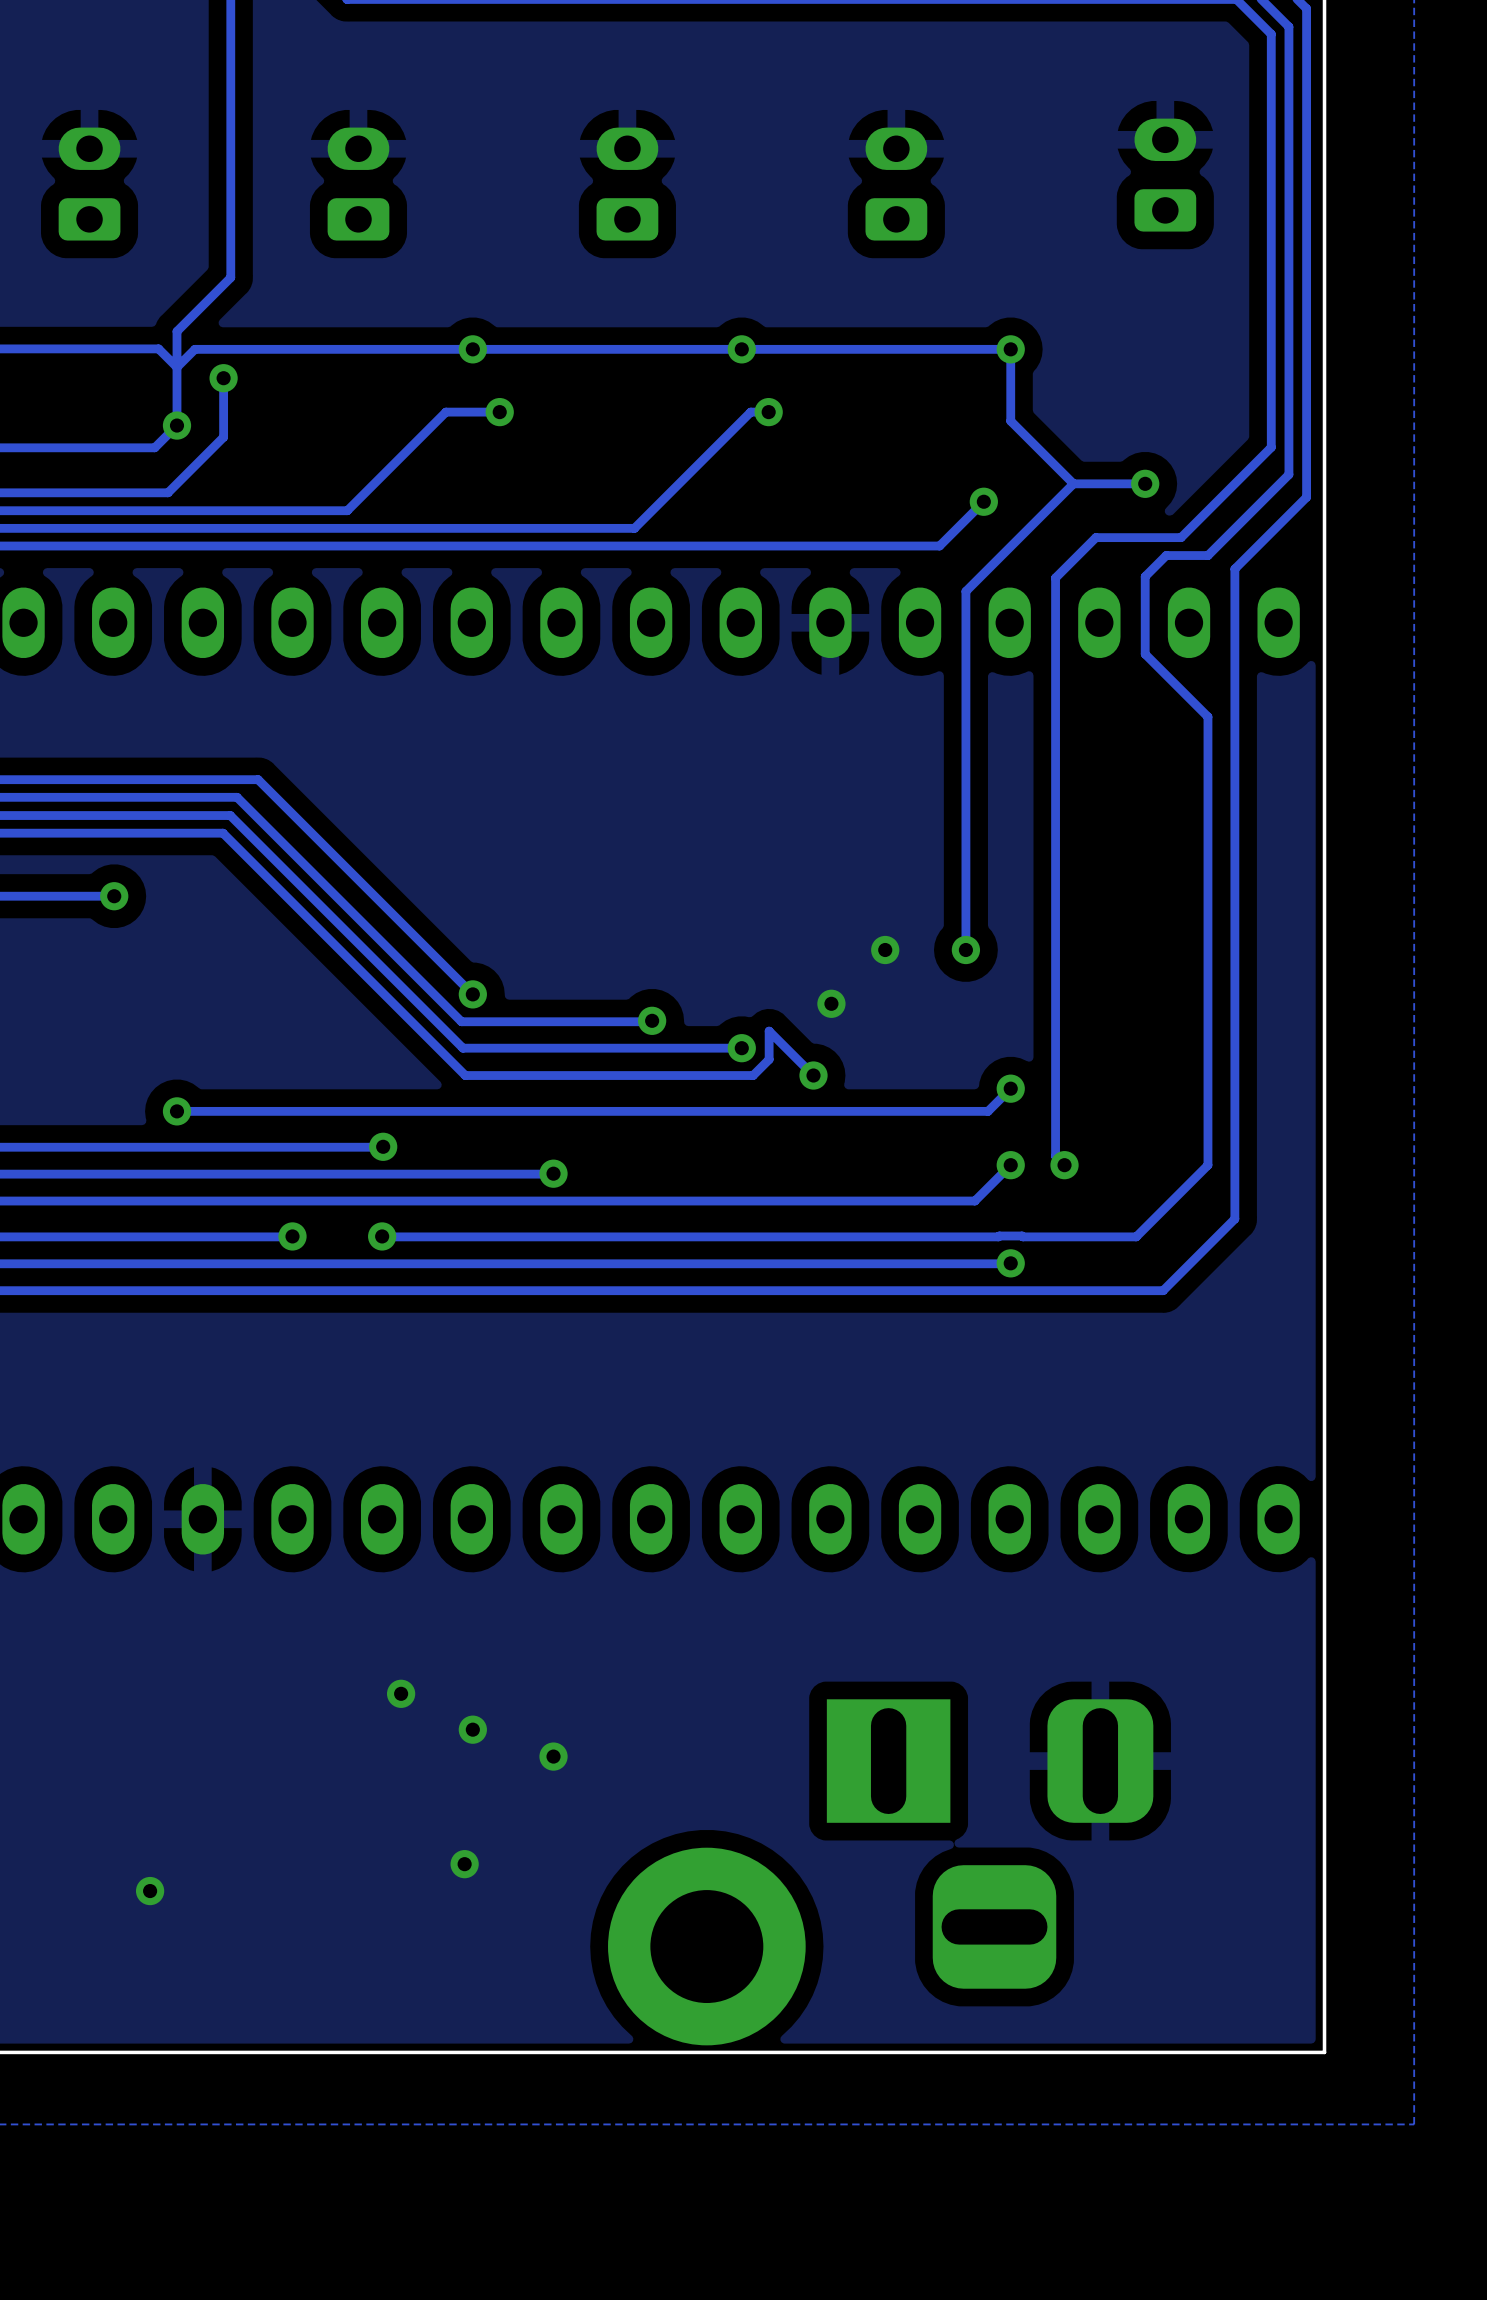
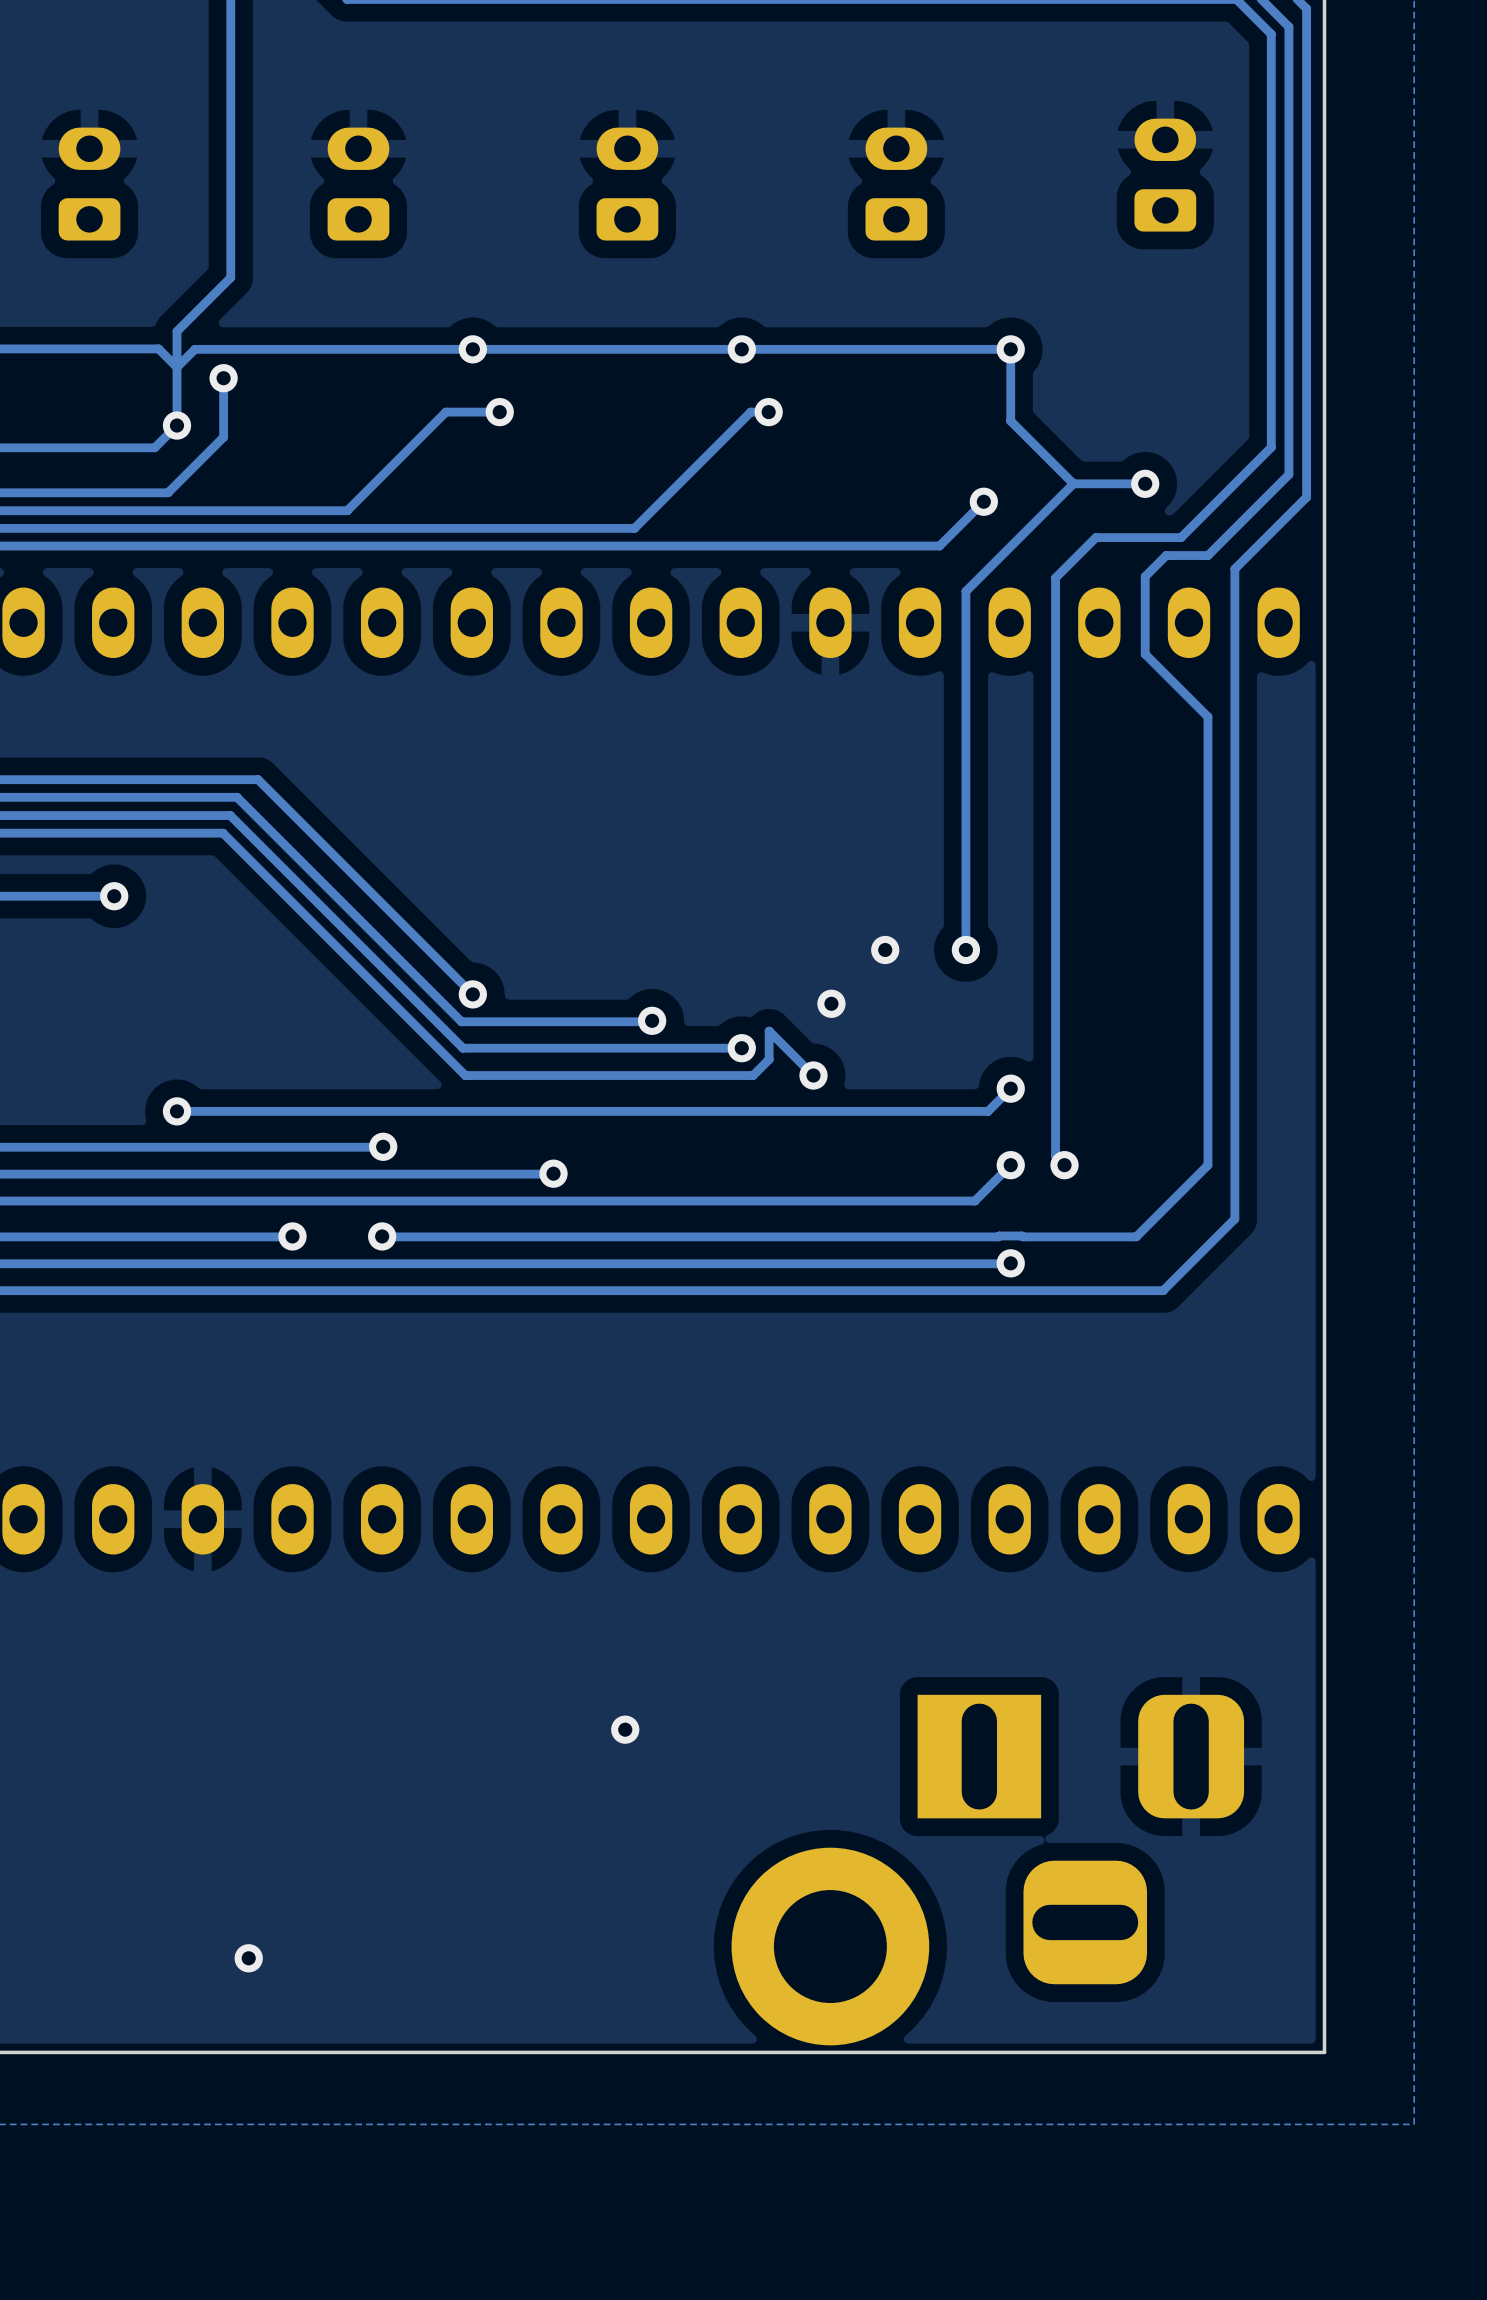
via: (401, 1693) -> none
via: (472, 1729) -> none
via: none -> (625, 1729)
via: (553, 1756) -> none
part position: (990, 1844) -> (1080, 1839)
via: (464, 1864) -> none
via: (150, 1891) -> none
part position: (706, 1946) -> (830, 1946)
via: none -> (248, 1958)

